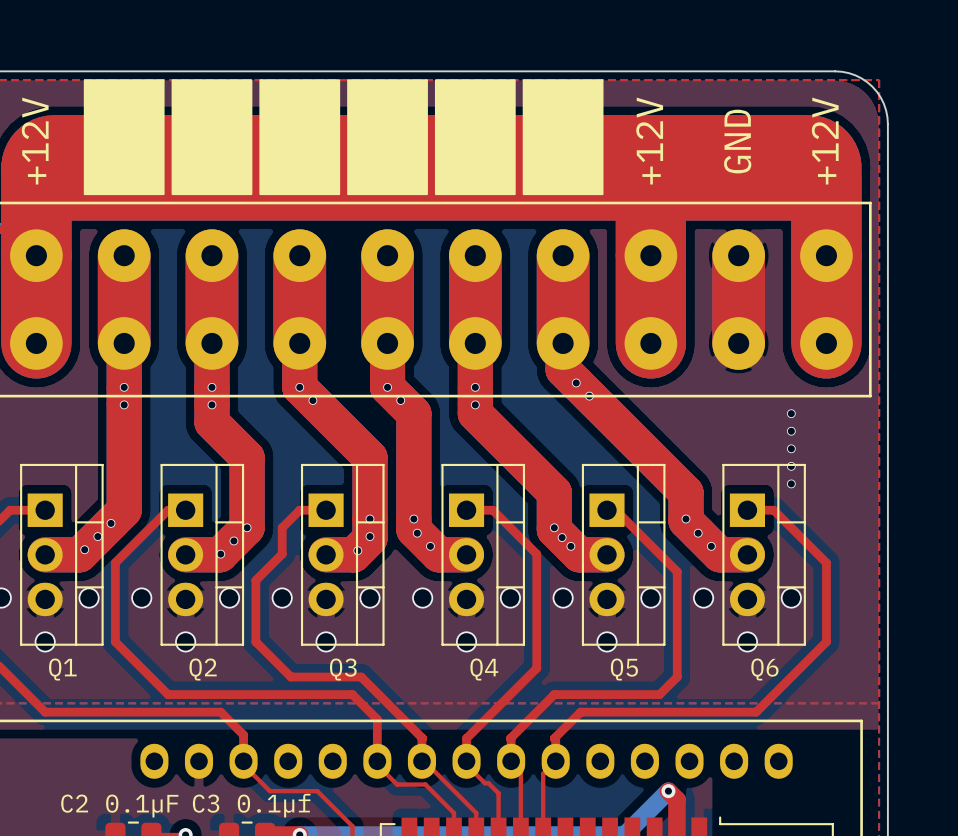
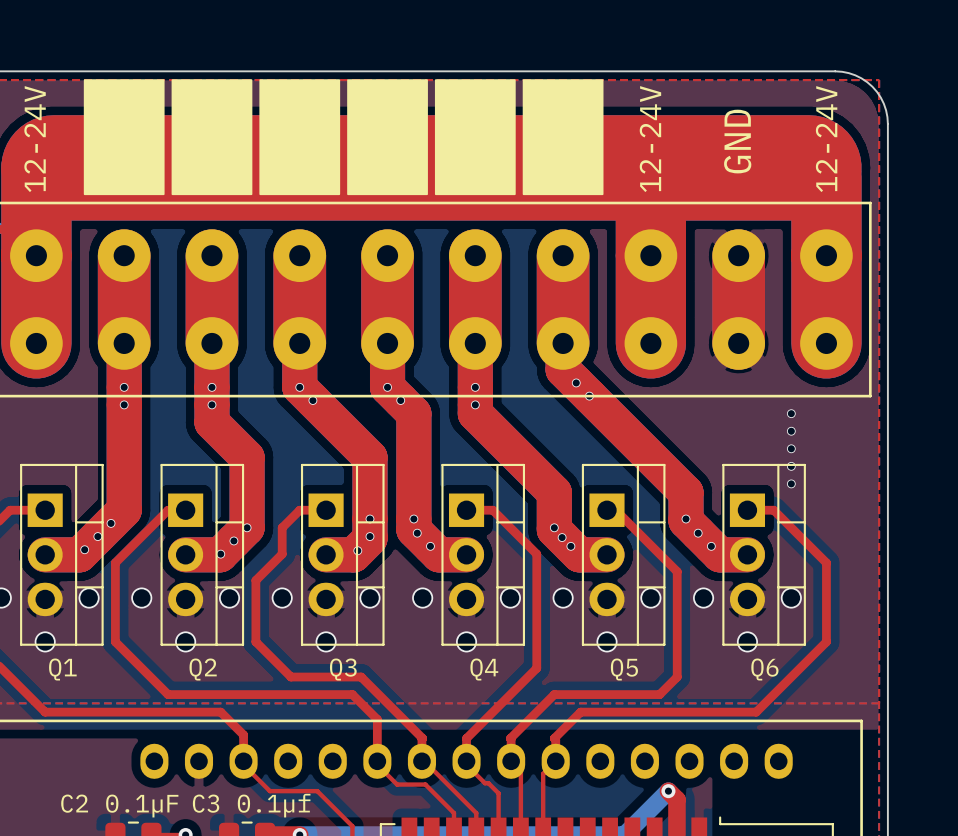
text: +12V (35, 141) -> 12-24V (35, 139)
text: +12V (649, 141) -> 12-24V (650, 139)
text: +12V (825, 141) -> 12-24V (826, 139)

